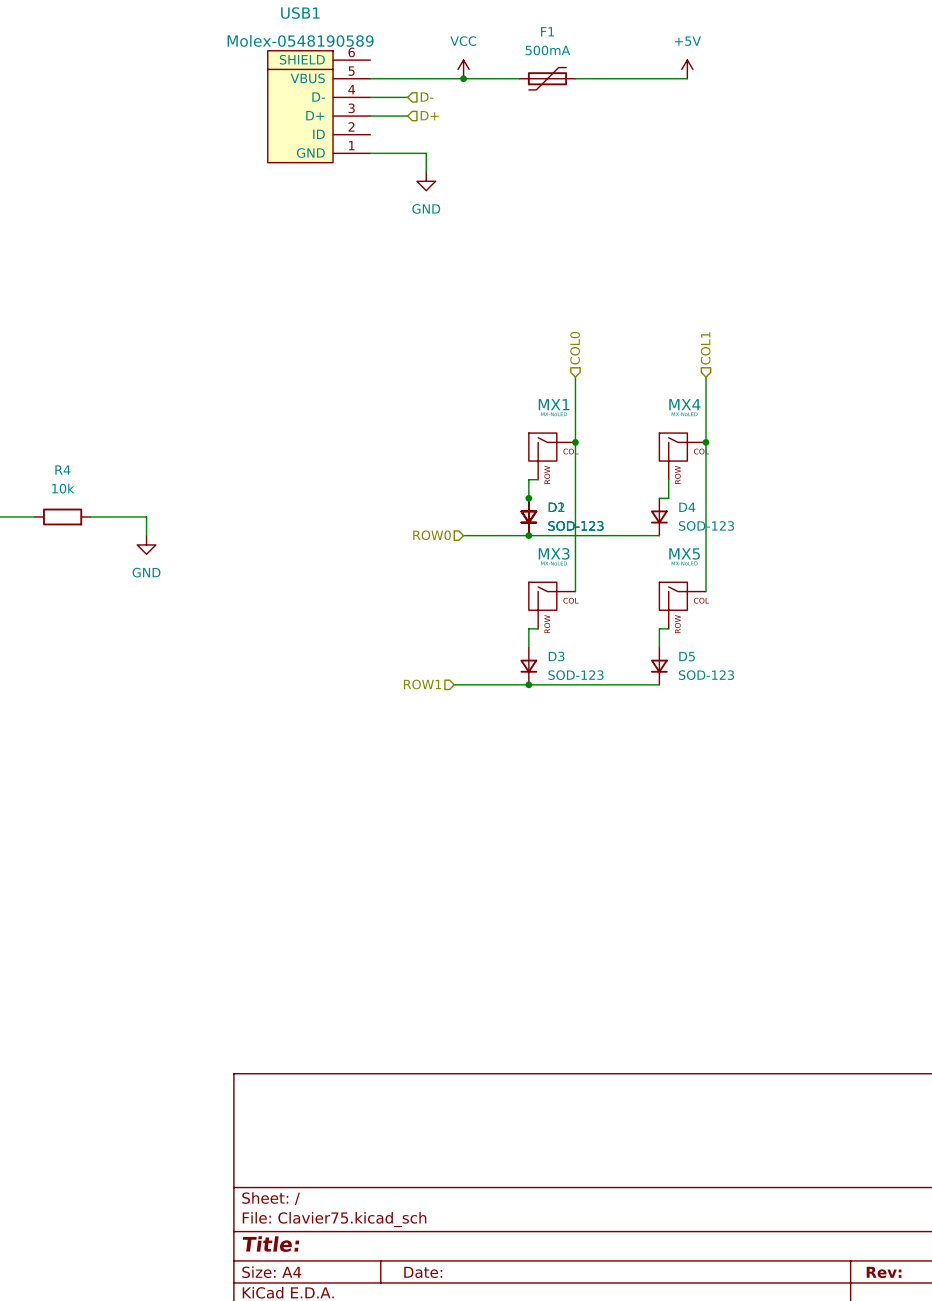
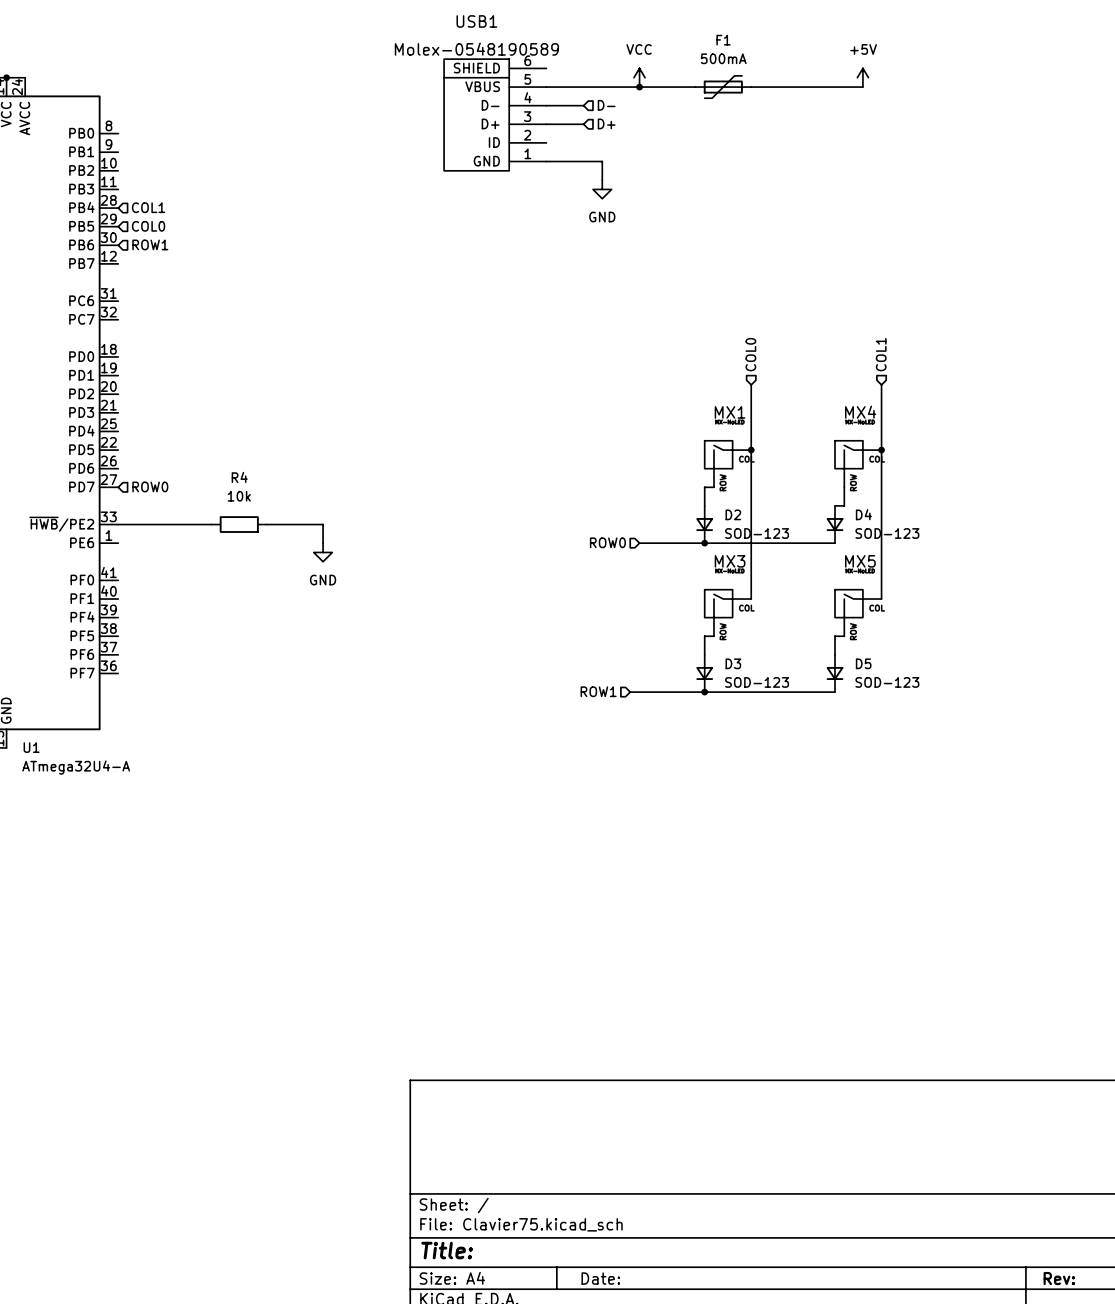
junction: (528, 498) -> none
part: SOD-123 (528, 516) -> none

